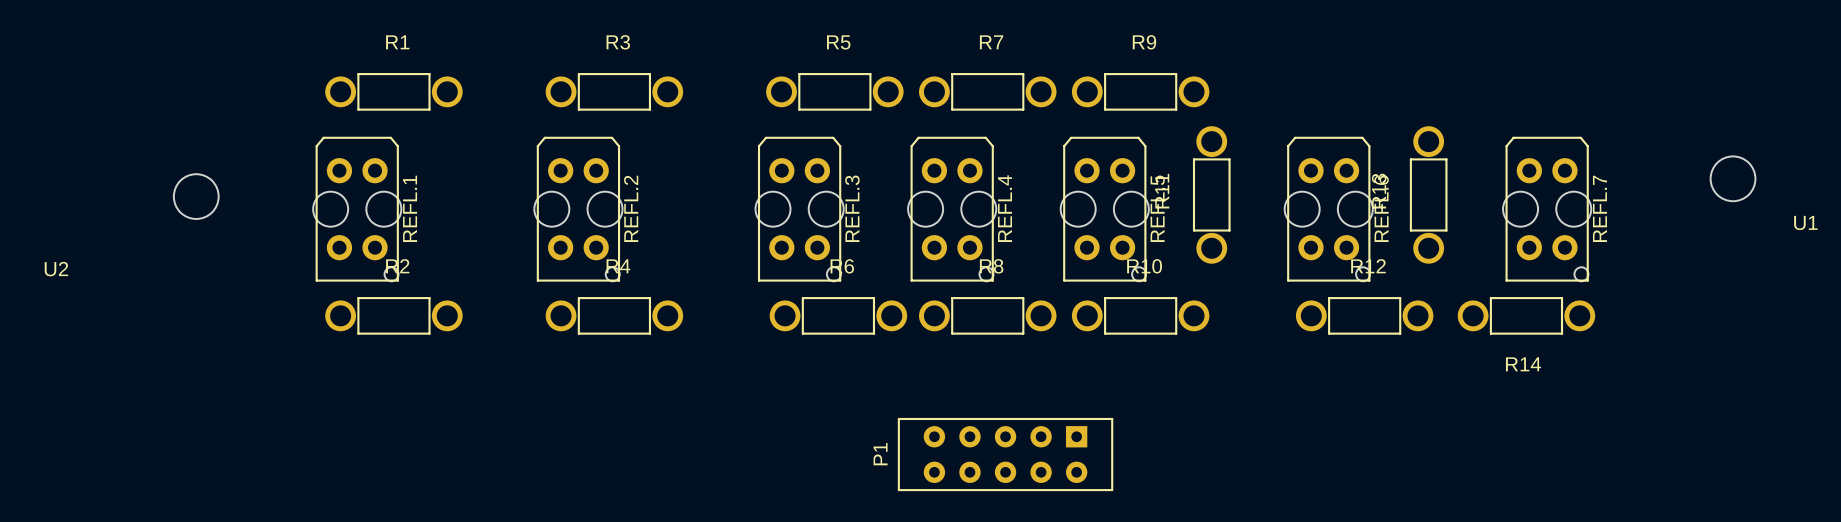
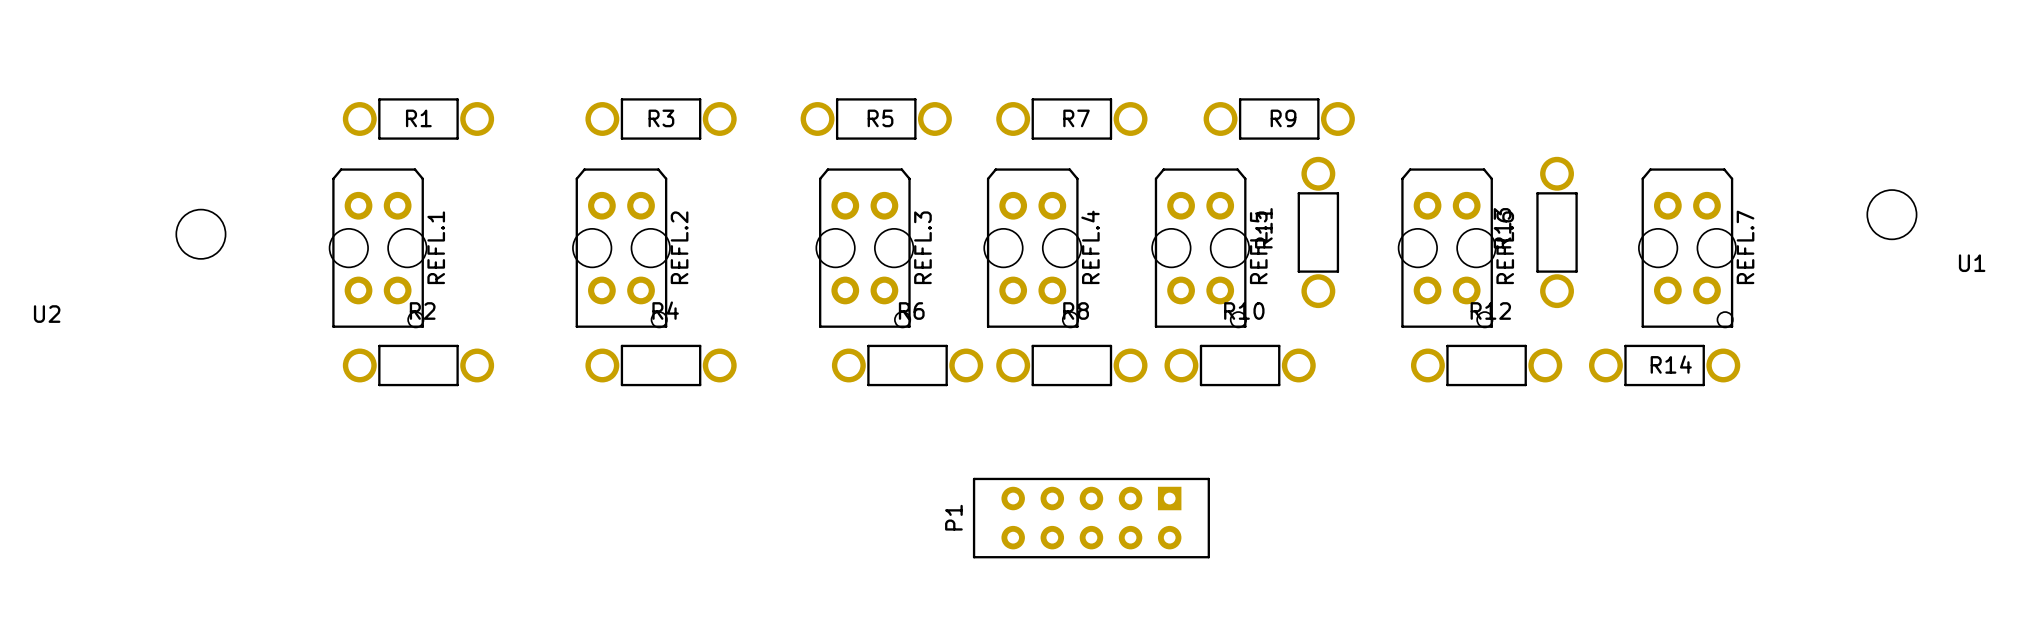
R1 name position: R1 (397, 42) -> R1 (418, 118)
R3 name position: R3 (618, 42) -> R3 (661, 118)
R5 name position: R5 (838, 42) -> R5 (880, 118)
R7 name position: R7 (991, 42) -> R7 (1076, 118)
R9 name position: R9 (1144, 42) -> R9 (1283, 118)
R5 position: (834, 91) -> (876, 119)
R9 position: (1140, 91) -> (1279, 119)
R14 name position: R14 (1523, 364) -> R14 (1671, 364)

